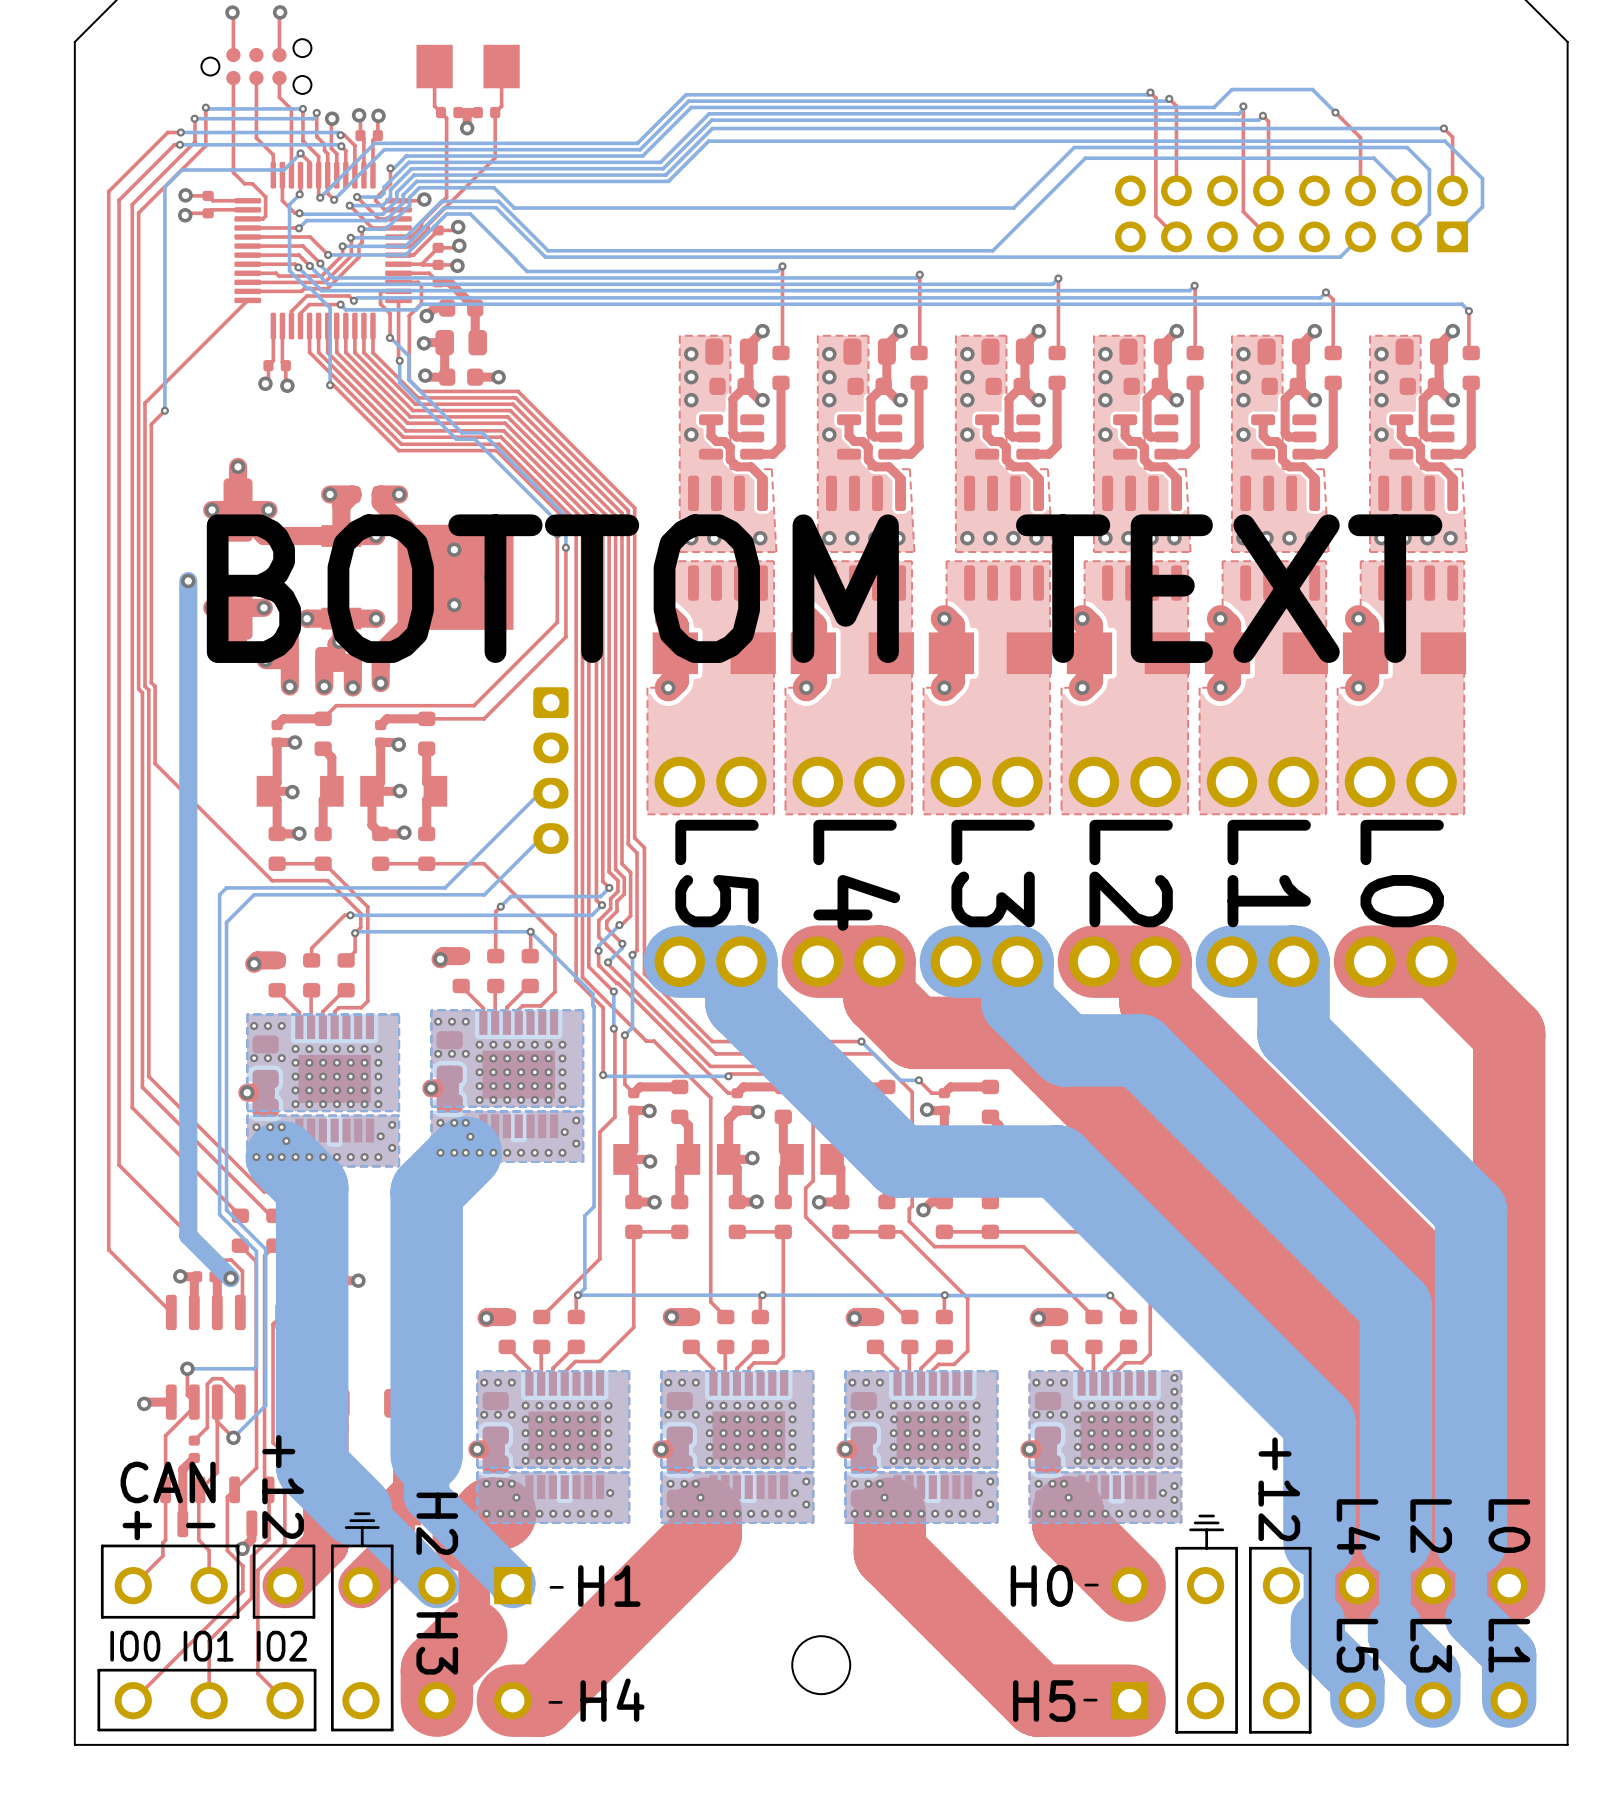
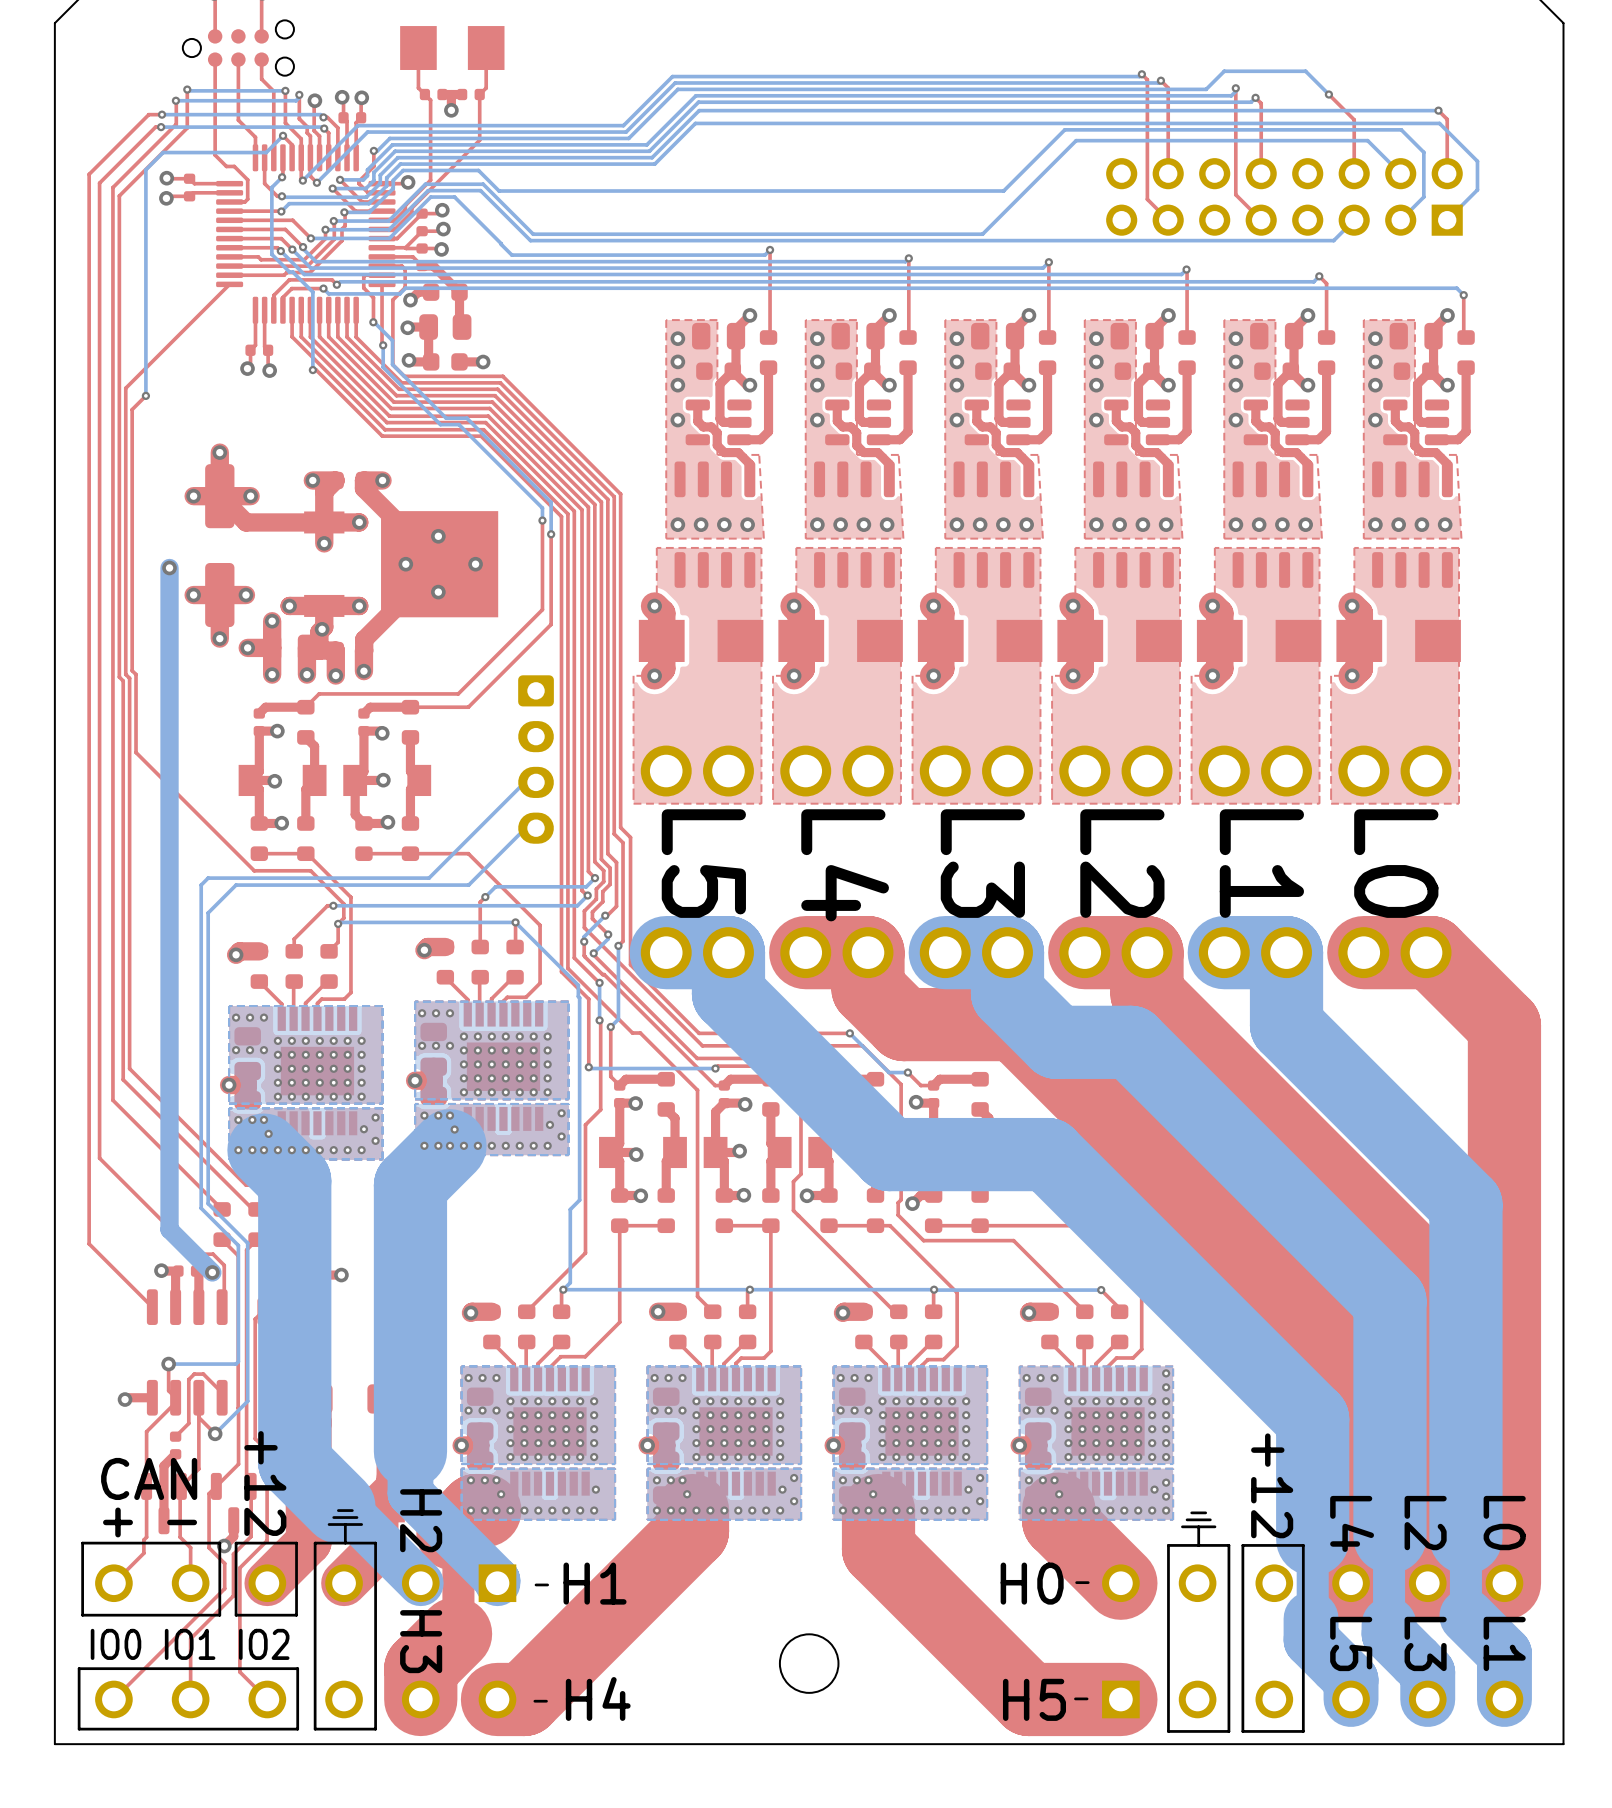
text: BOTTOM TEXT (824, 588) -> none

